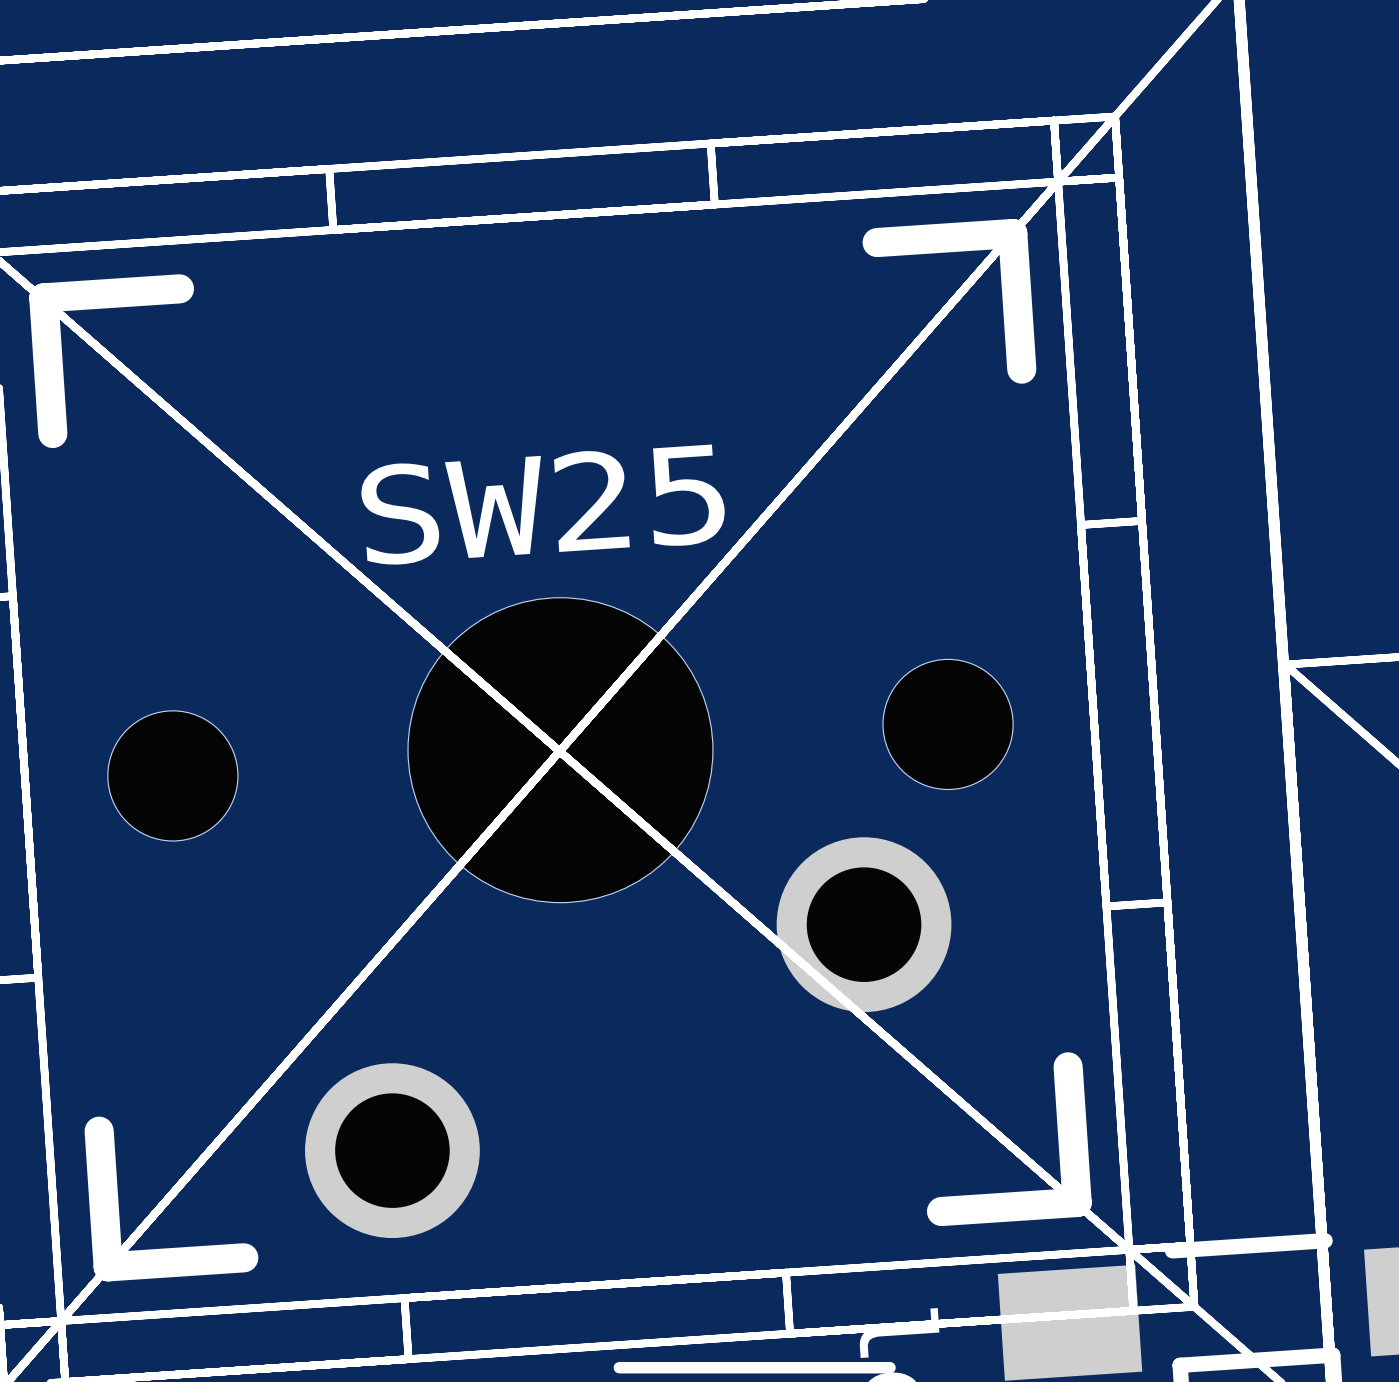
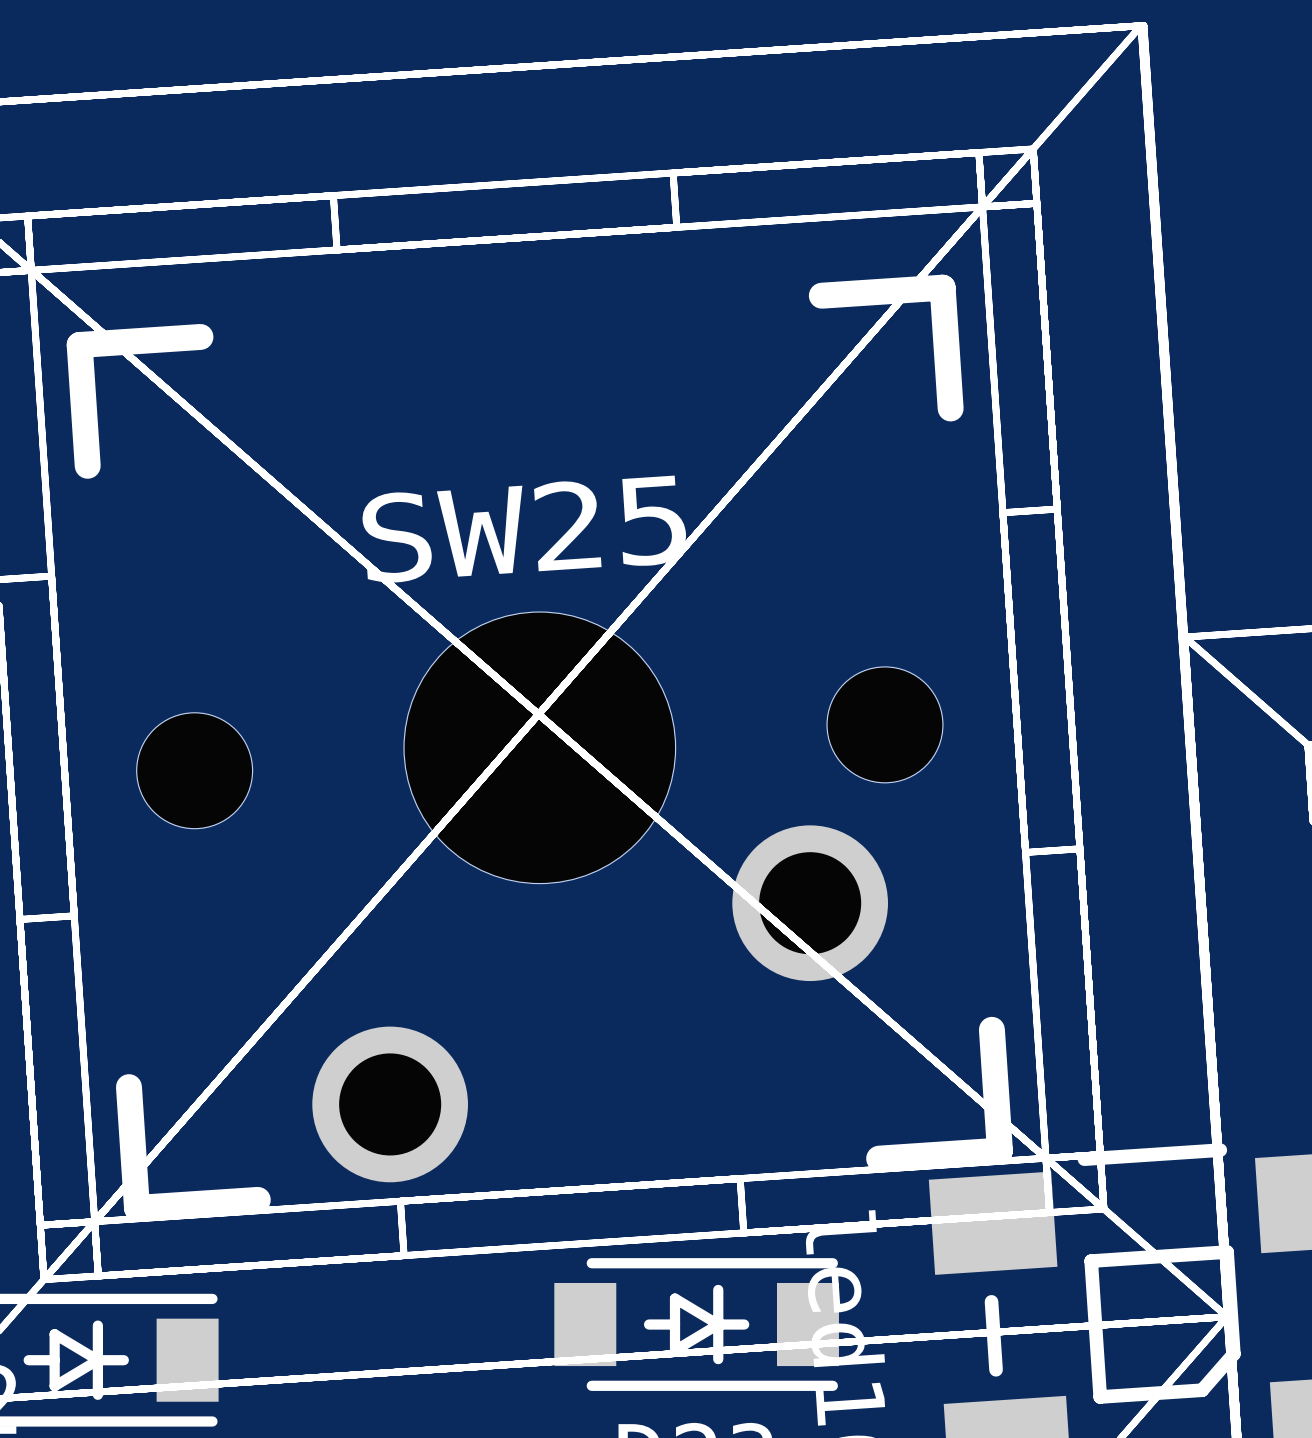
SW25 position: (560, 750) -> (539, 747)

